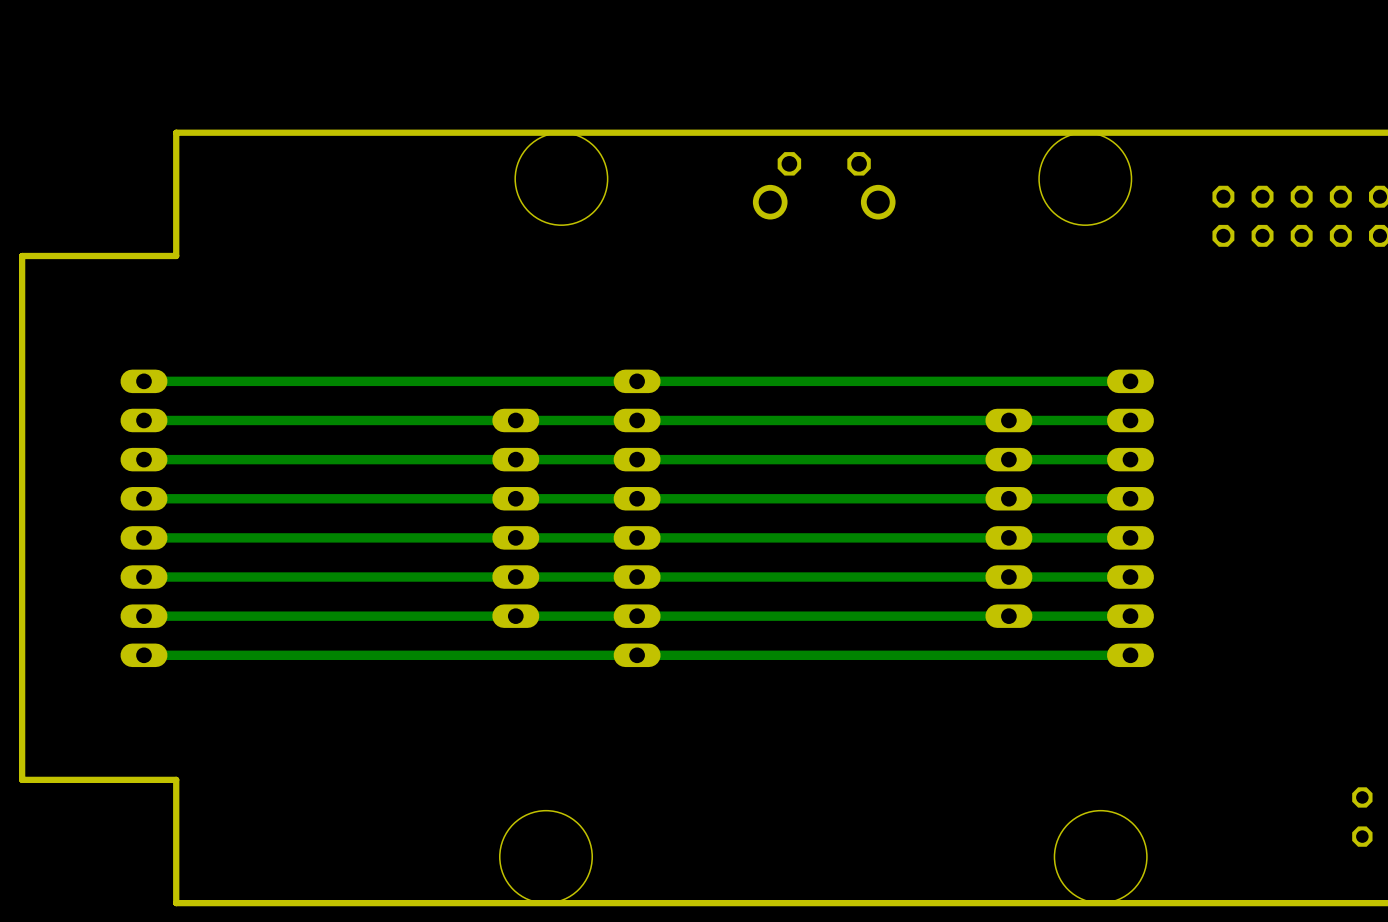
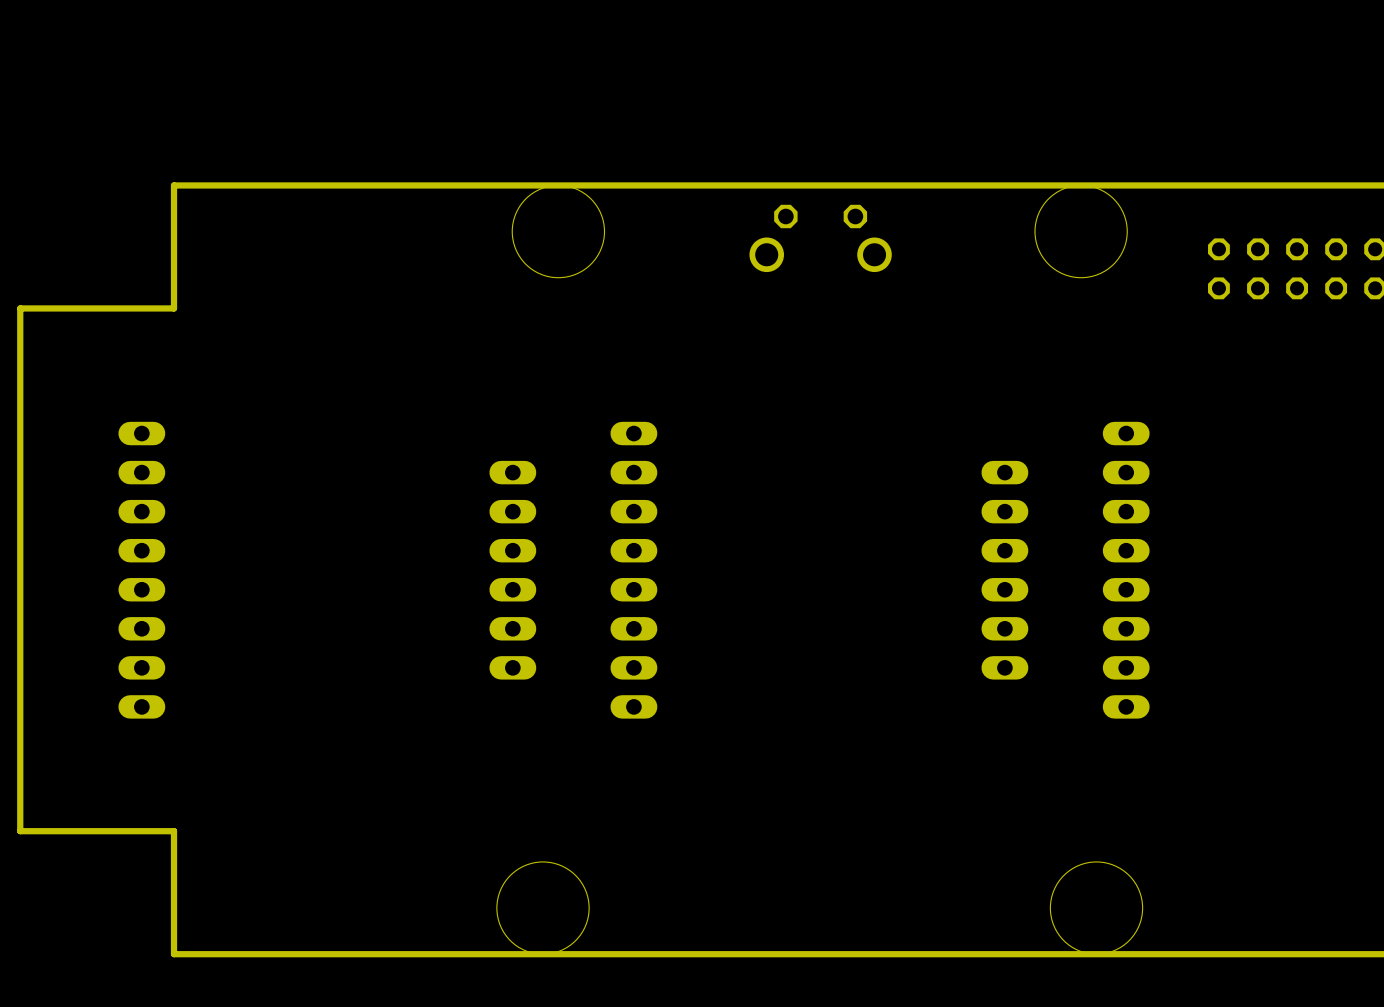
track: (1130, 381) (143, 381) -> none
track: (1130, 420) (143, 420) -> none
track: (1130, 459) (143, 459) -> none
track: (1130, 498) (143, 498) -> none
track: (1130, 537) (143, 537) -> none
track: (1130, 577) (143, 577) -> none
track: (1130, 616) (143, 616) -> none
track: (1130, 655) (143, 655) -> none
part: (1362, 817) -> none

